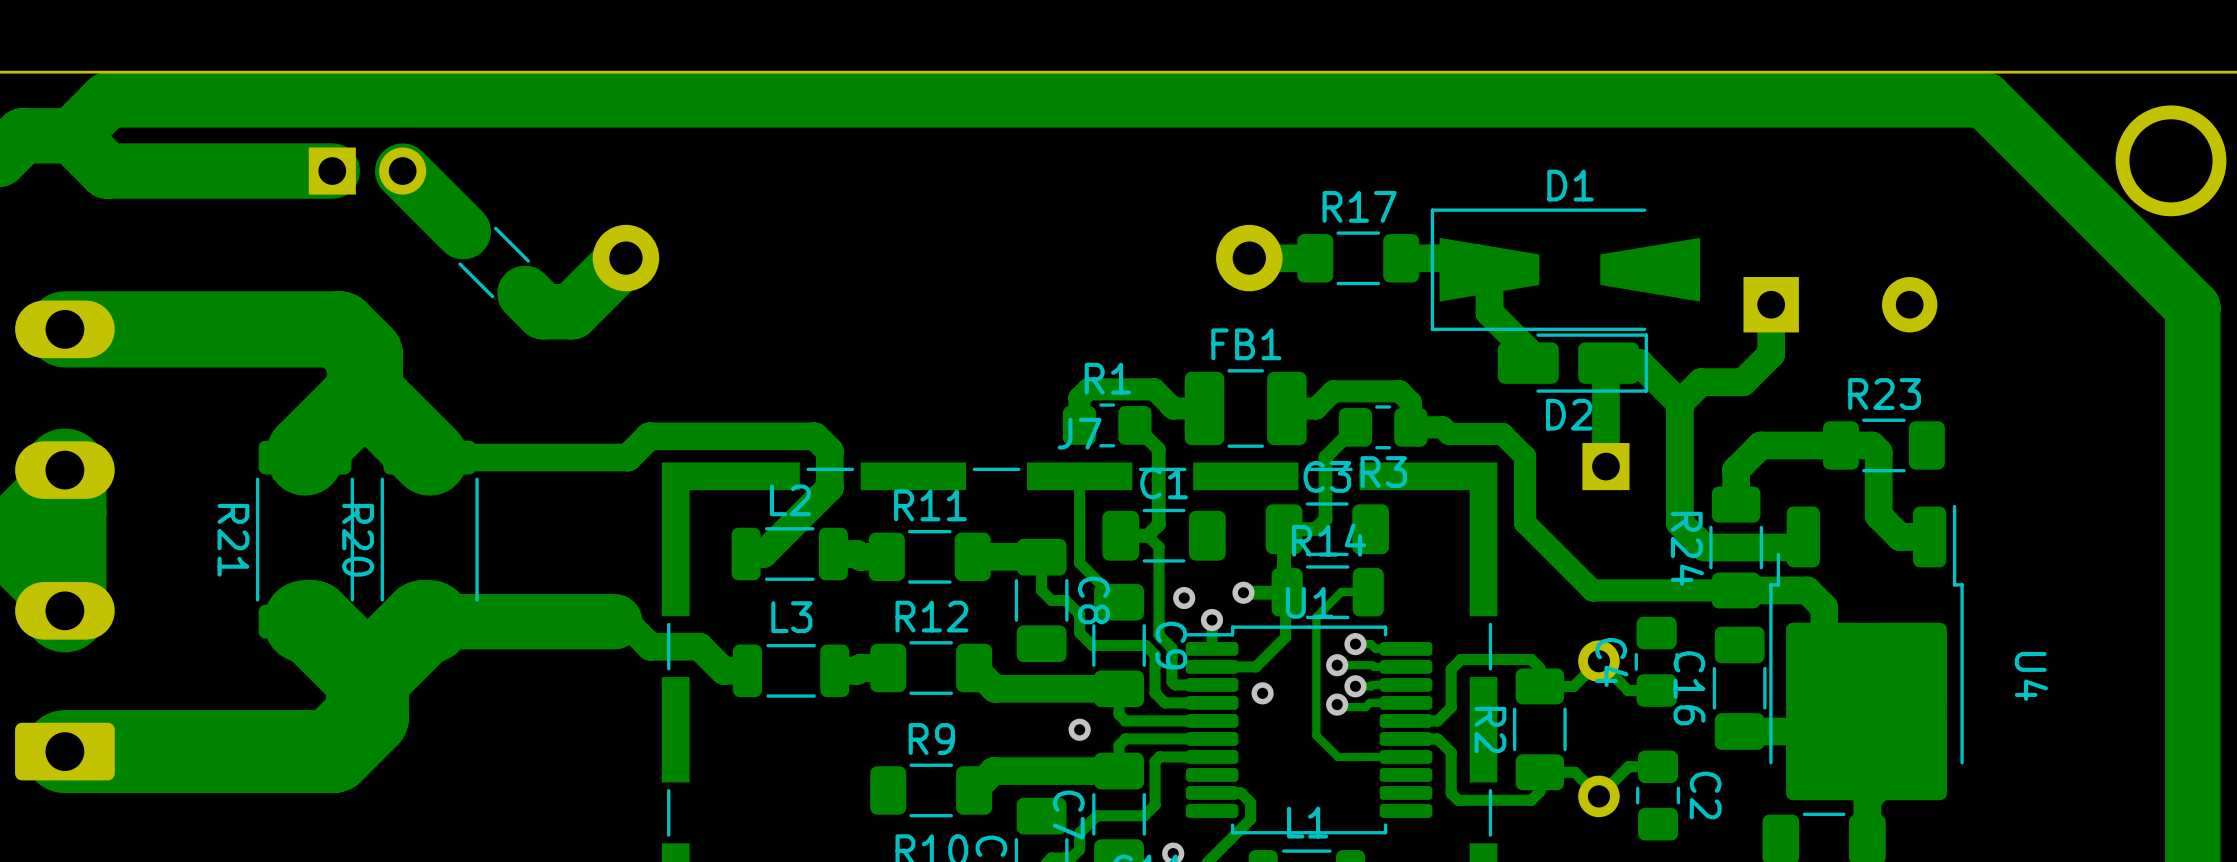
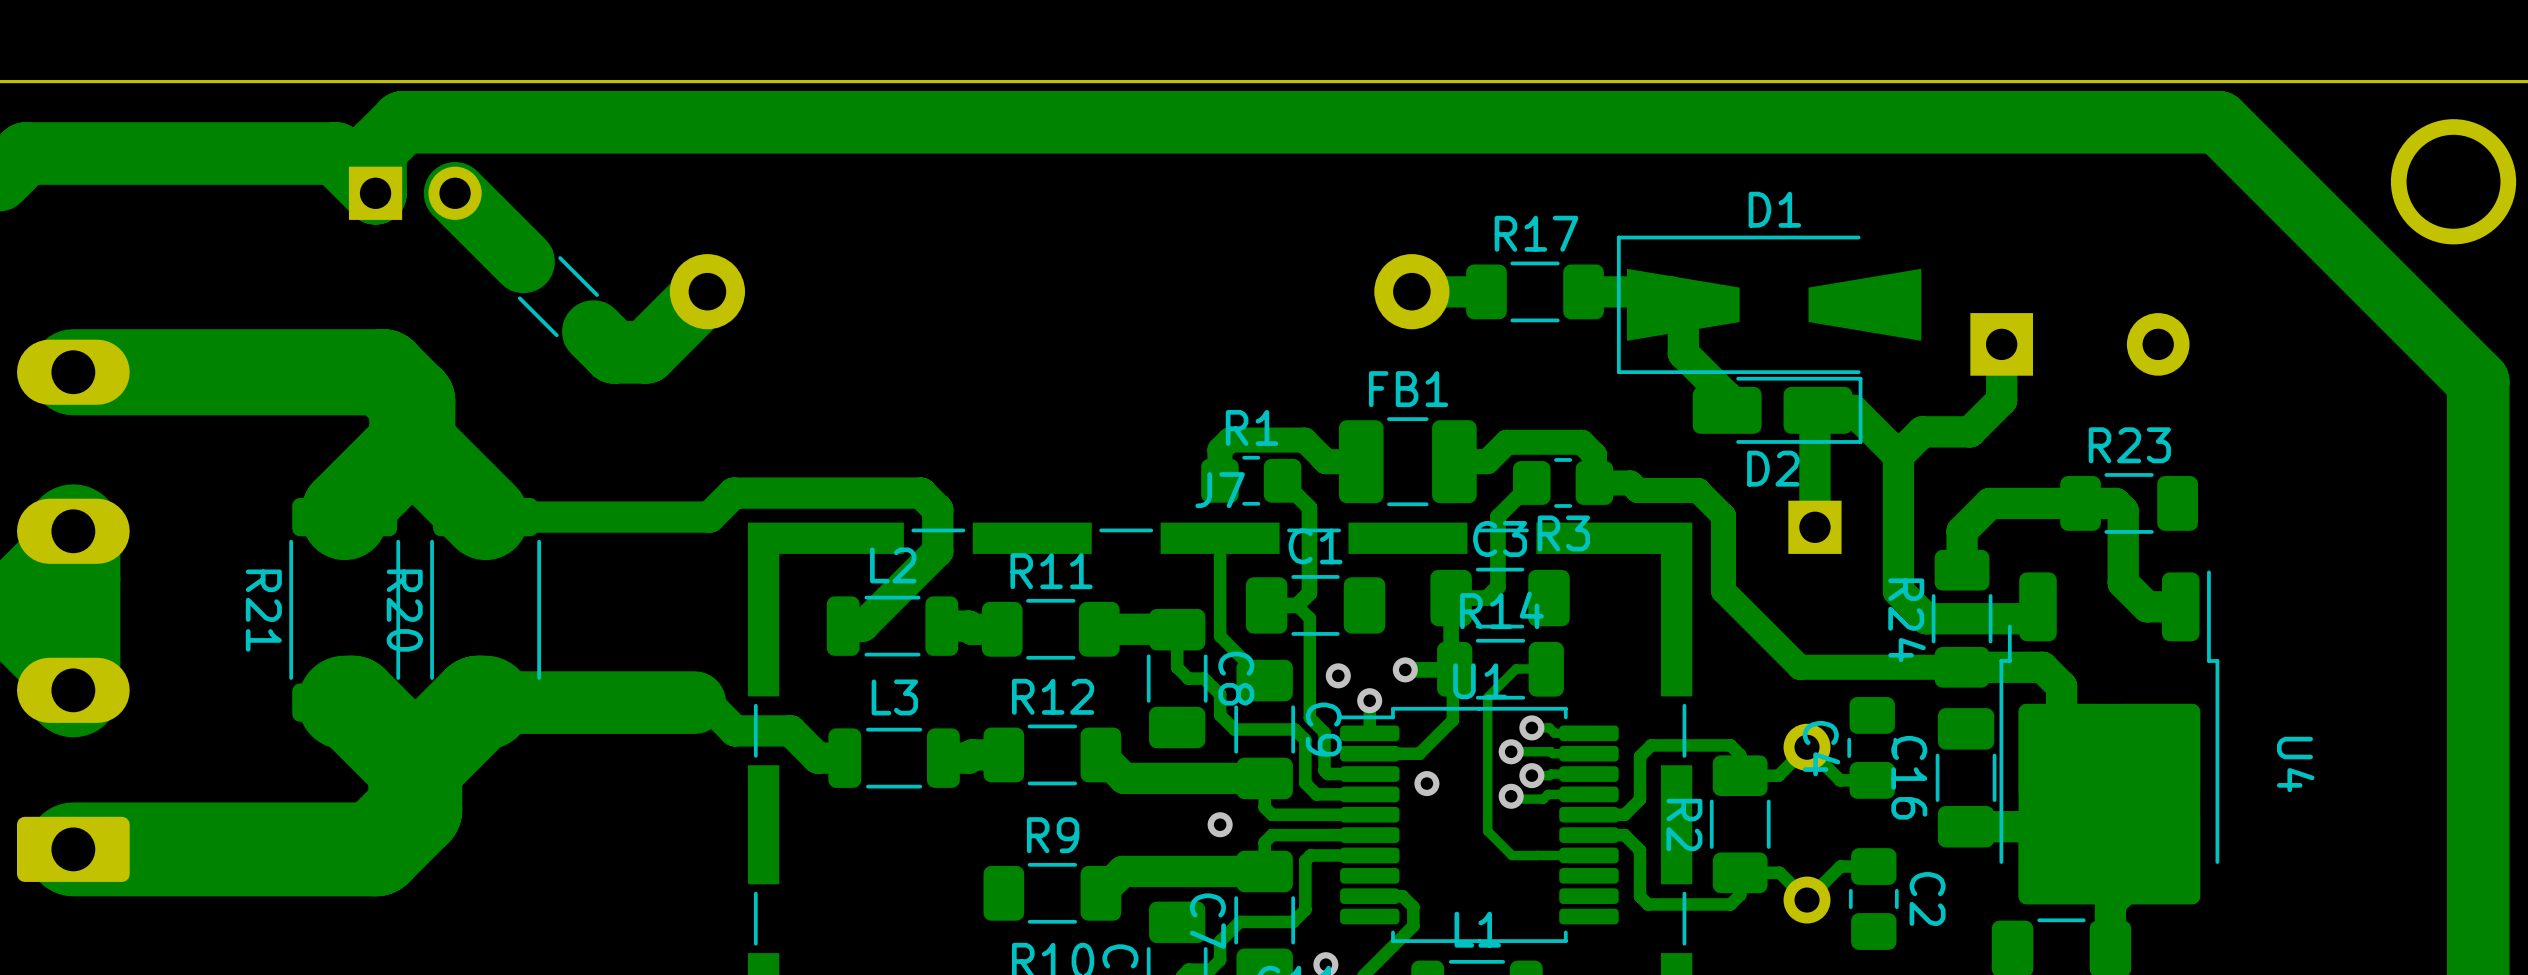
track: (332, 171) (107, 171) (71, 135) (107, 99) (1984, 99) (2192, 308) (2192, 337) -> (81, 153) (335, 153) (375, 193) (375, 149) (402, 122) (2218, 122) (2478, 381)

